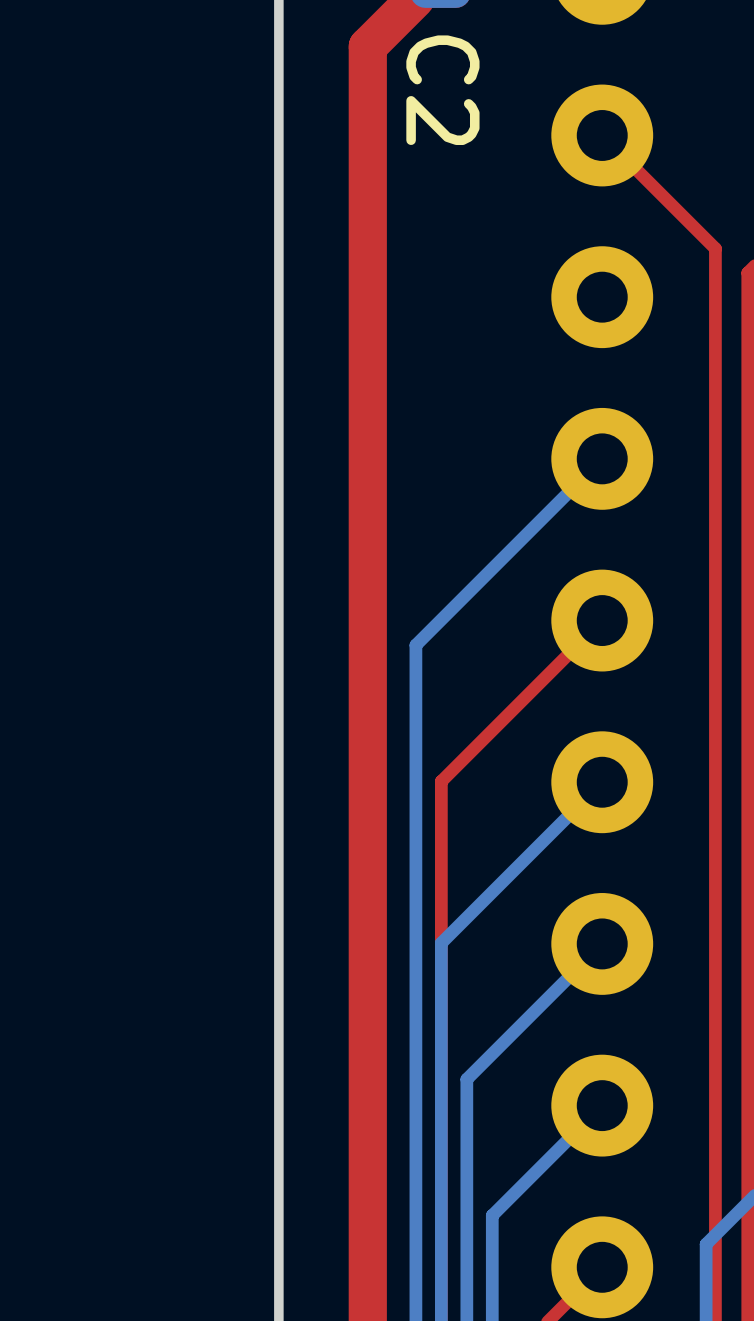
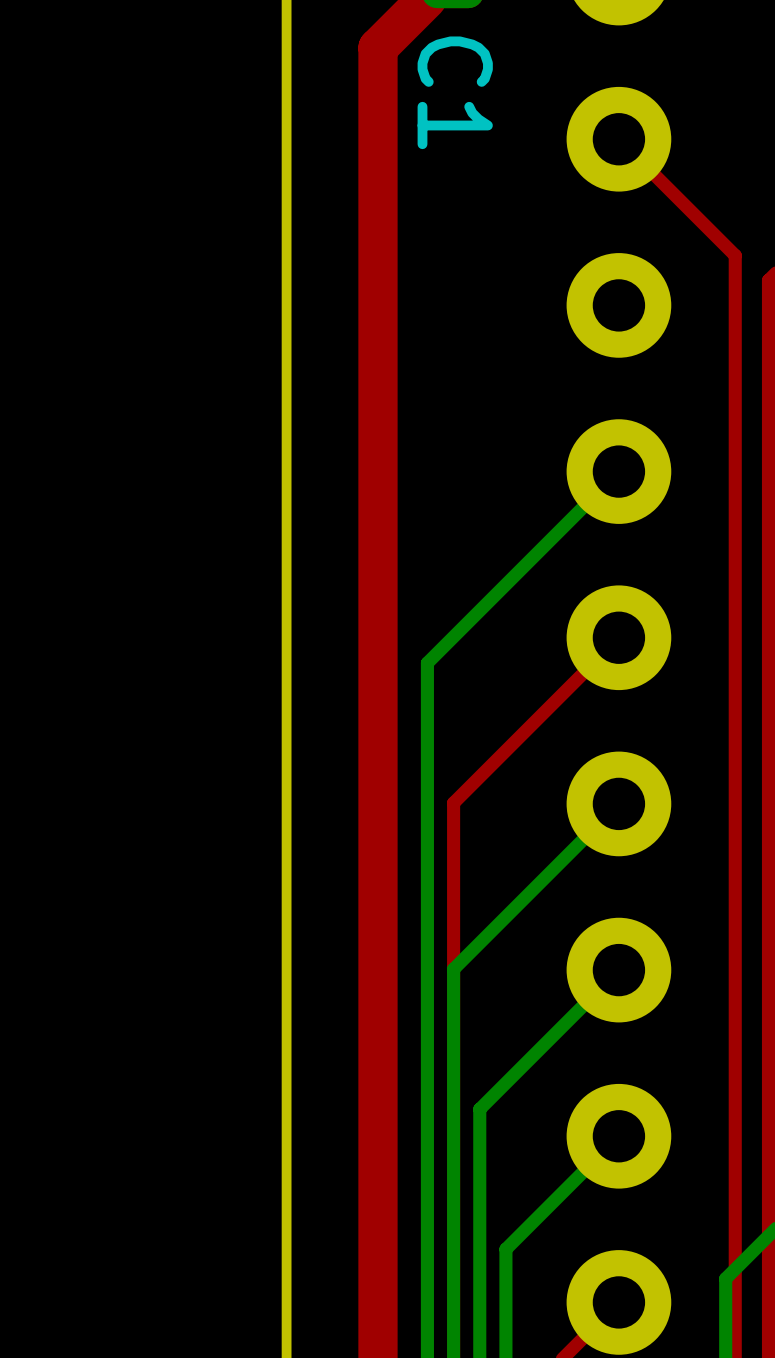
C2 name: C2 (442, 90) -> C1 (455, 92)

